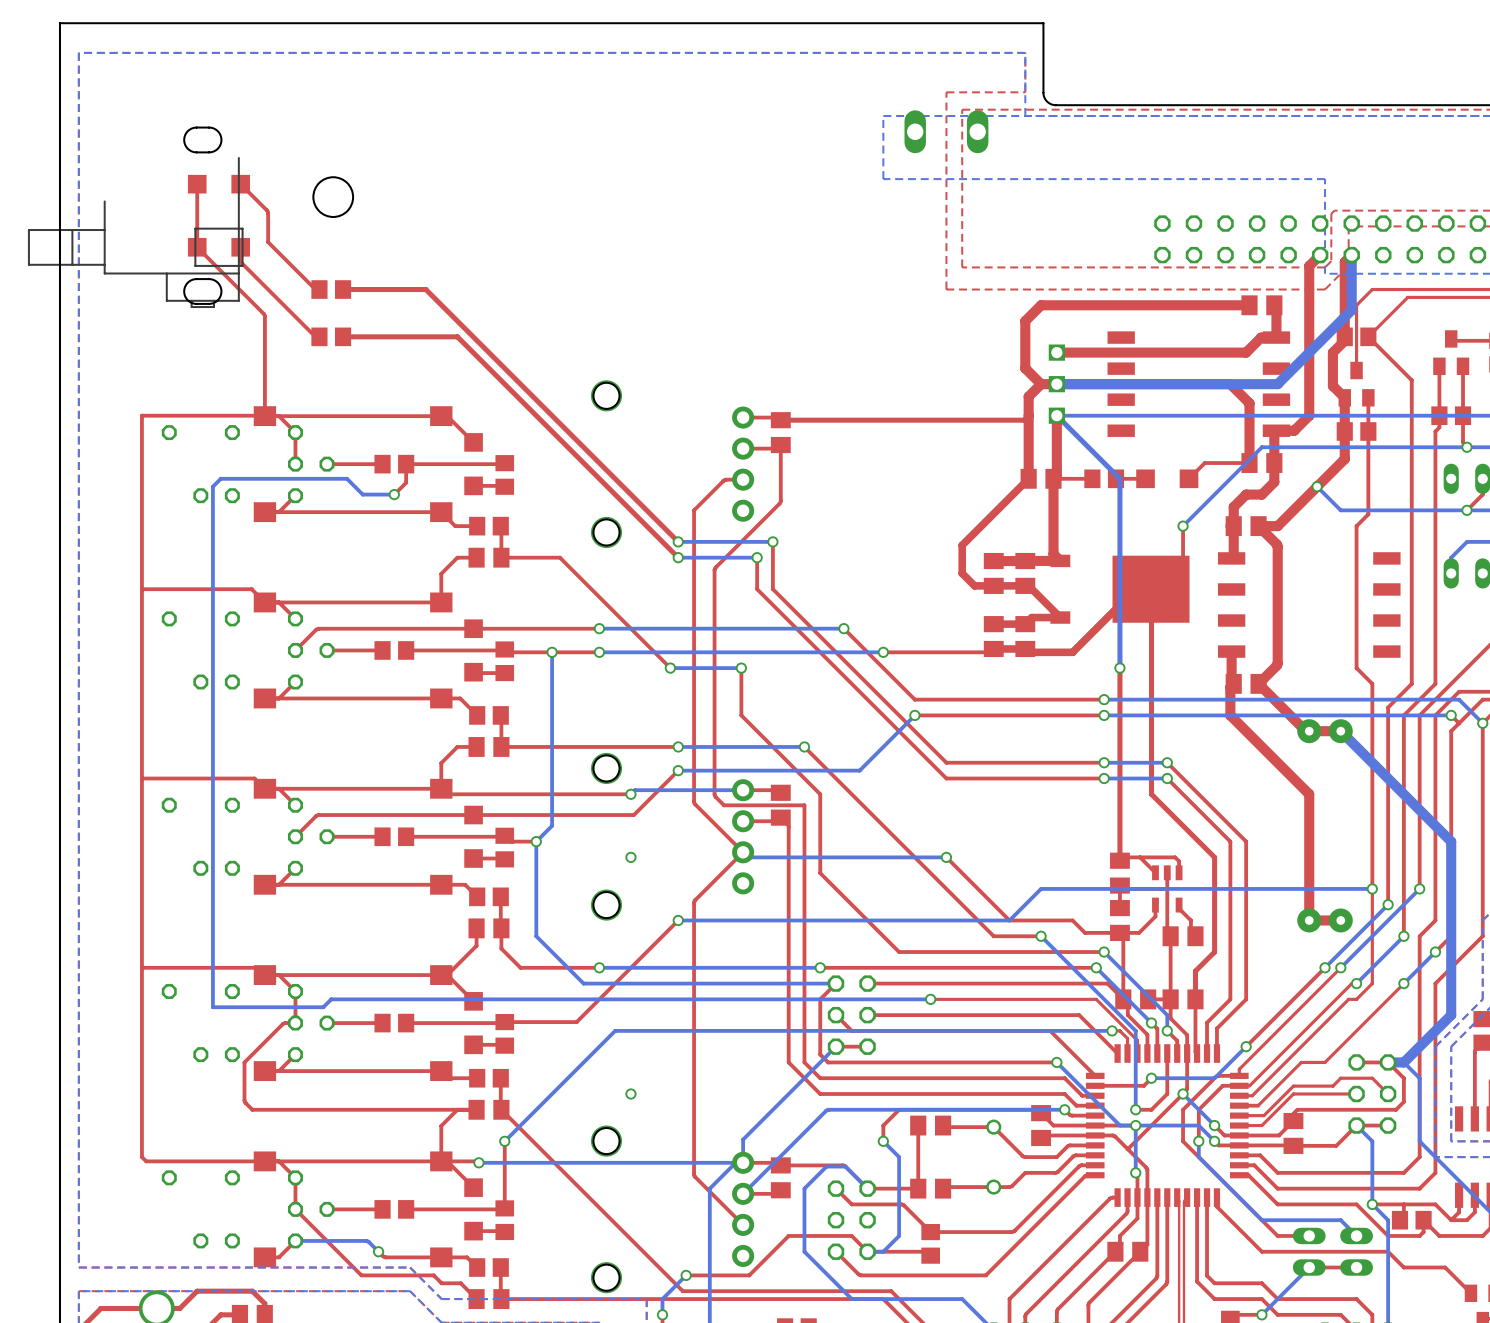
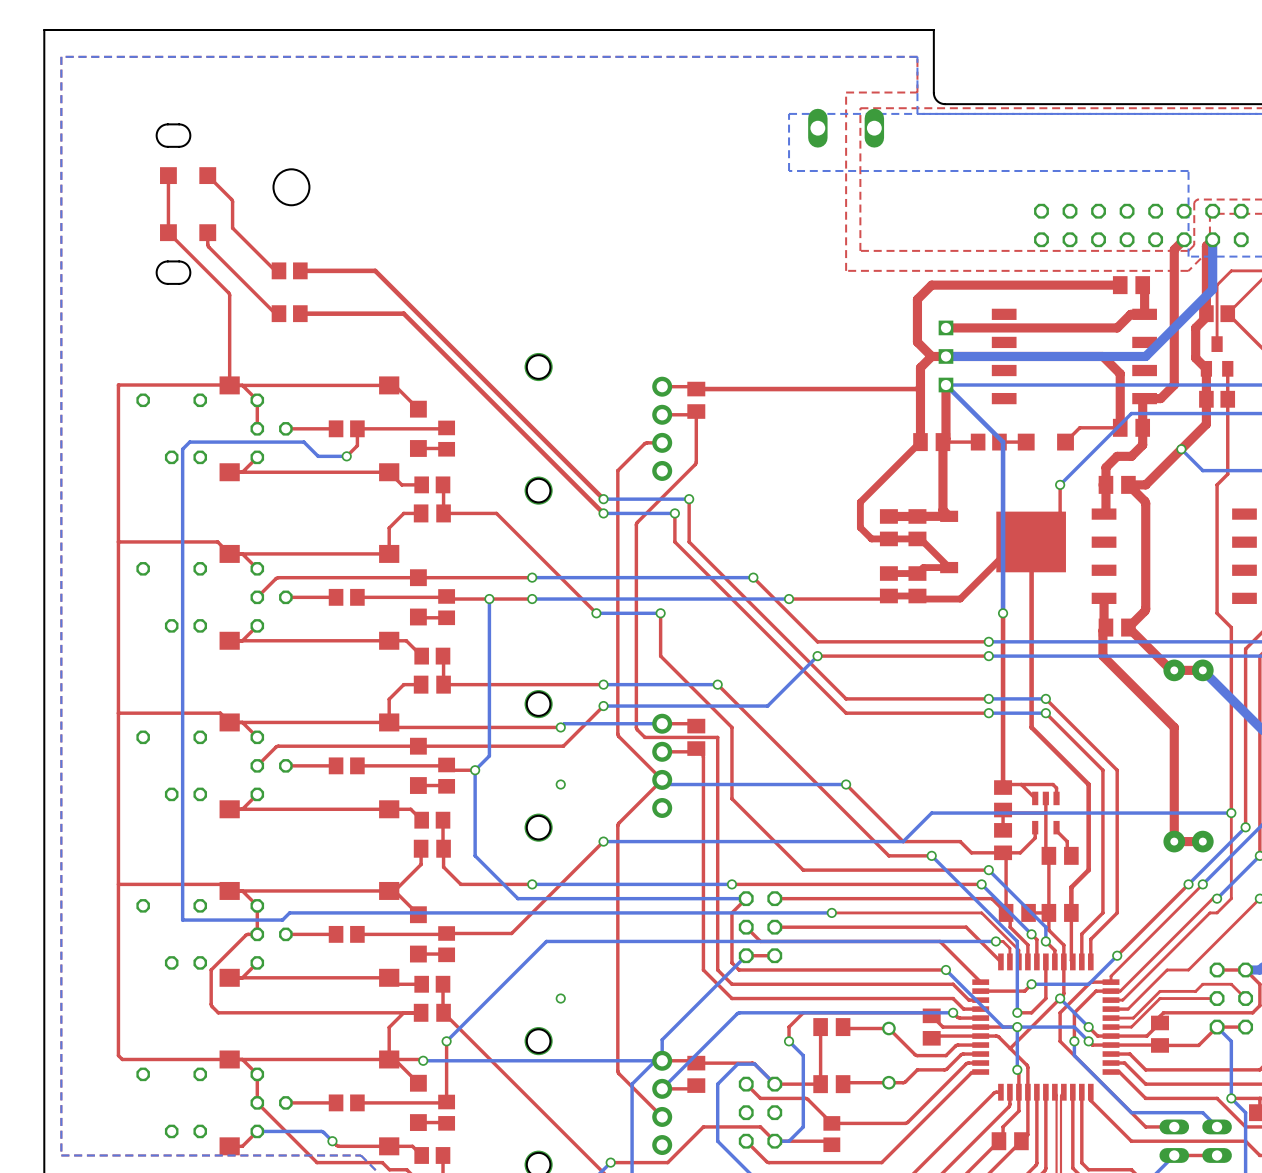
drawing: [28, 126, 244, 308] -> none
drawing: none -> [155, 123, 192, 285]

